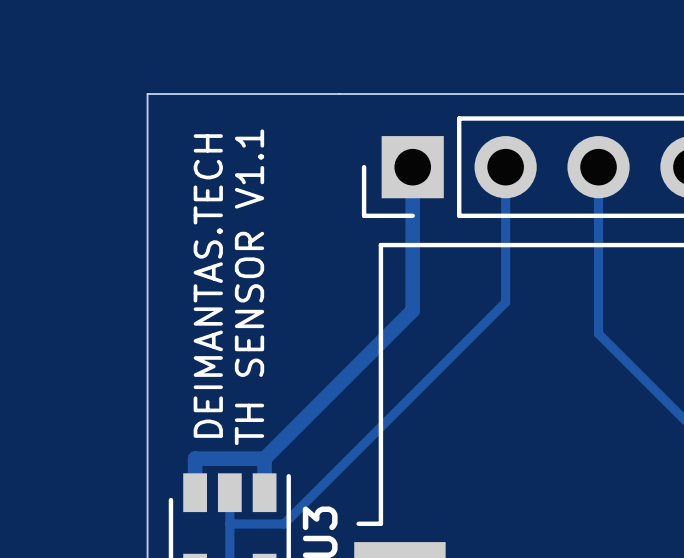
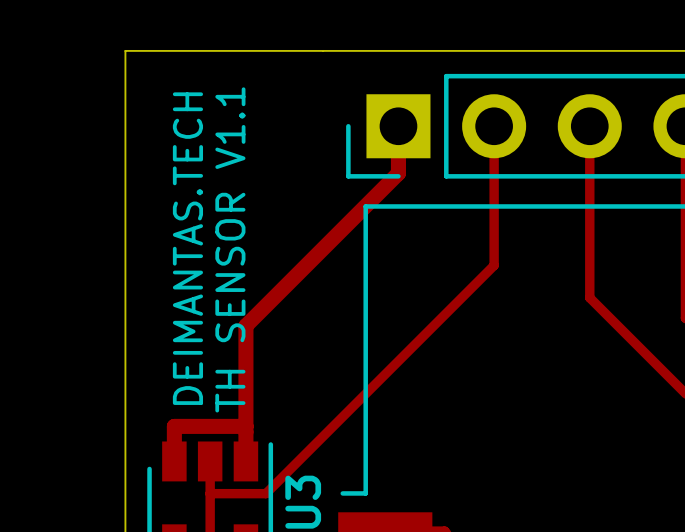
track: (412, 212) (412, 310) (264, 458) -> (398, 173) (245, 325) (245, 426)

